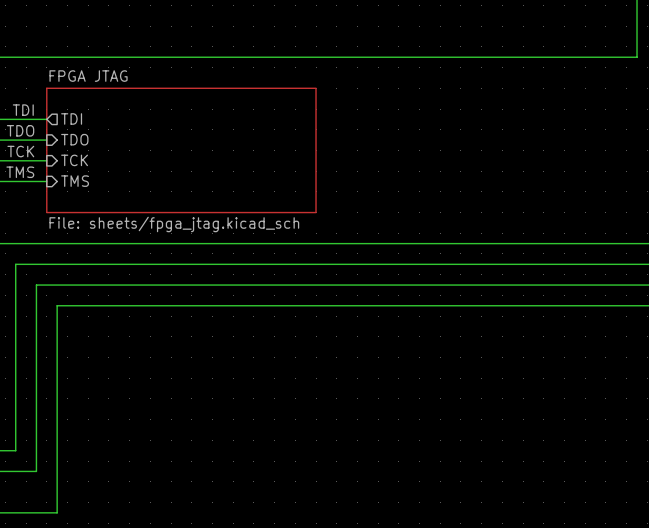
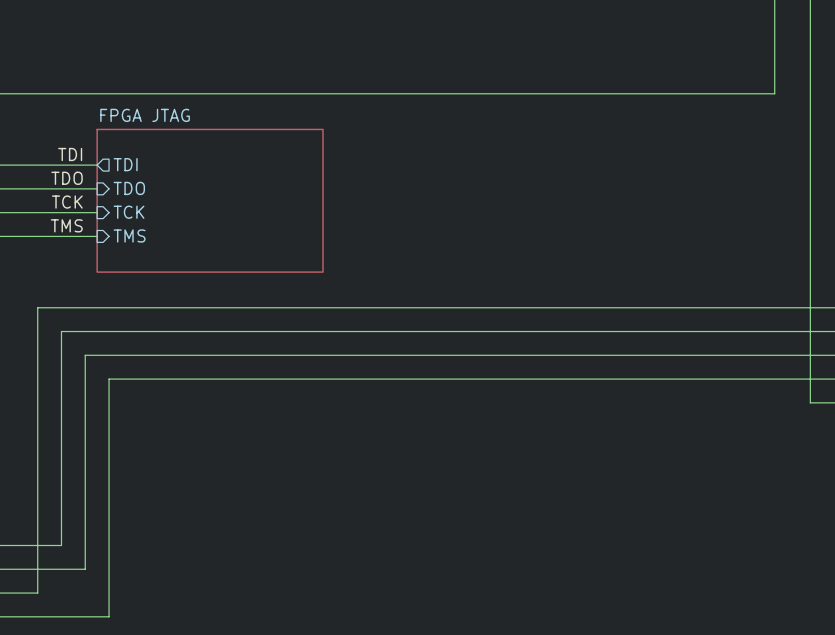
sheet FPGA JTAG: none -> (210, 200)
sheet FPGA JTAG: File: sheets/fpga_jtag.kicad_sch (181, 150) -> none

